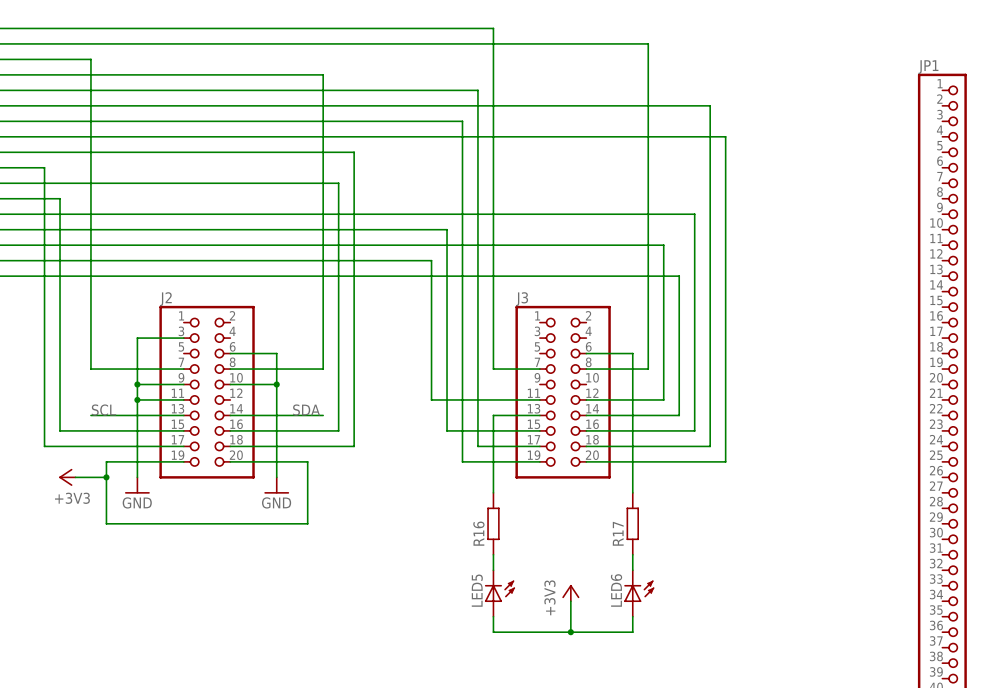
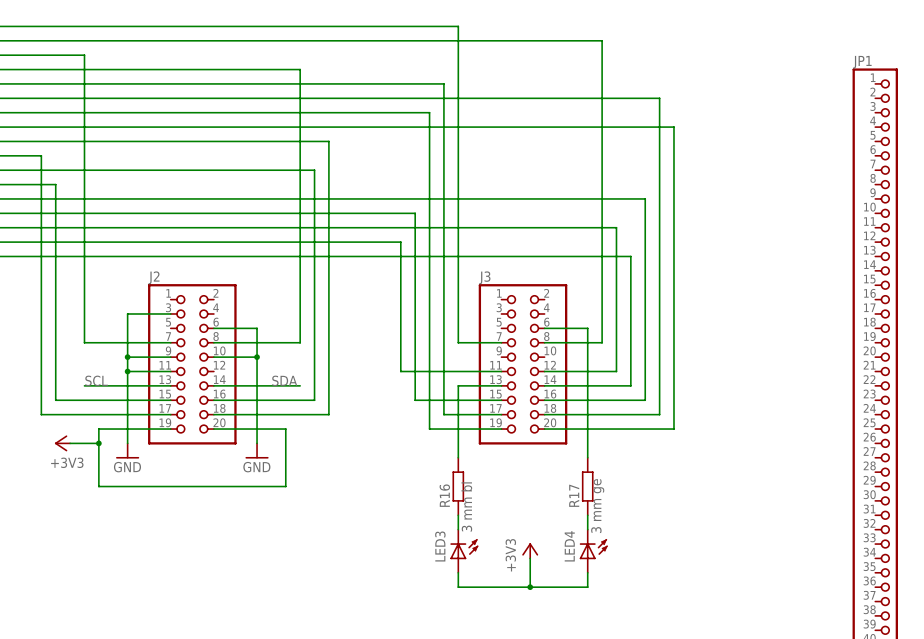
LED6 value: none -> 3 mm ge (597, 506)
LED5 value: none -> 3 mm bl (466, 506)
LED5 name: LED5 (477, 590) -> LED3 (440, 546)
LED6 name: LED6 (616, 590) -> LED4 (569, 546)

